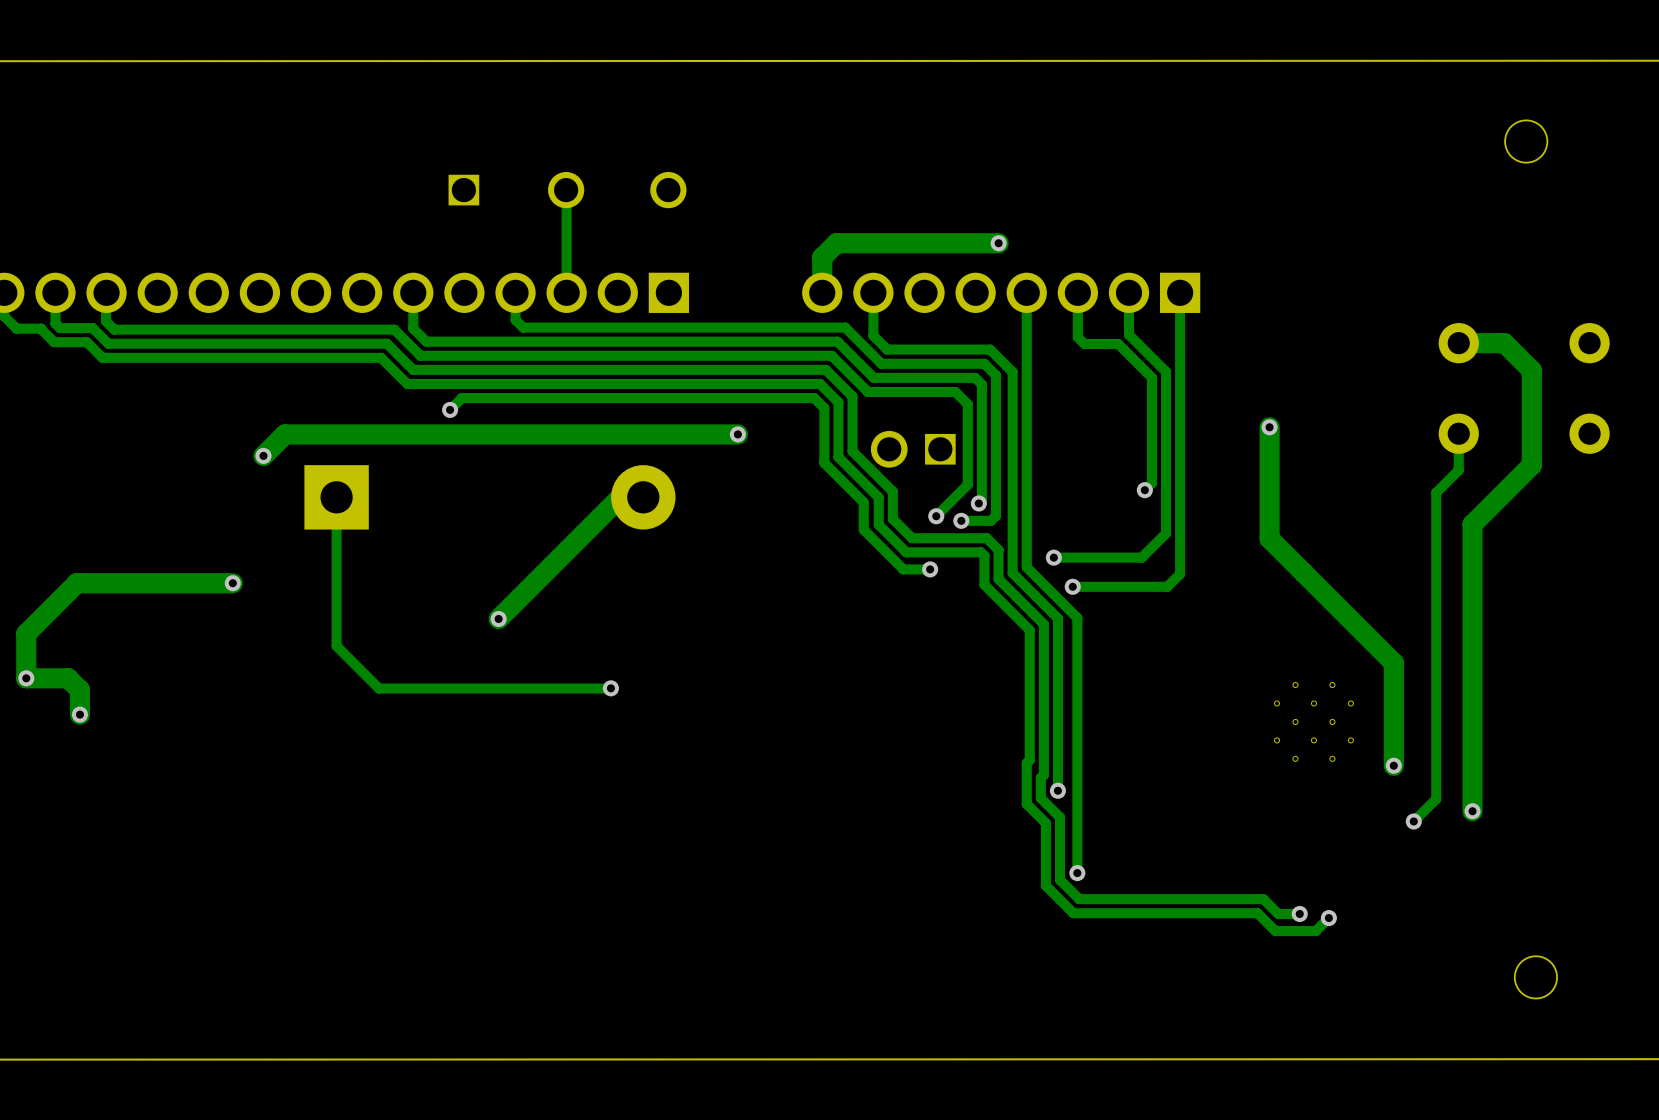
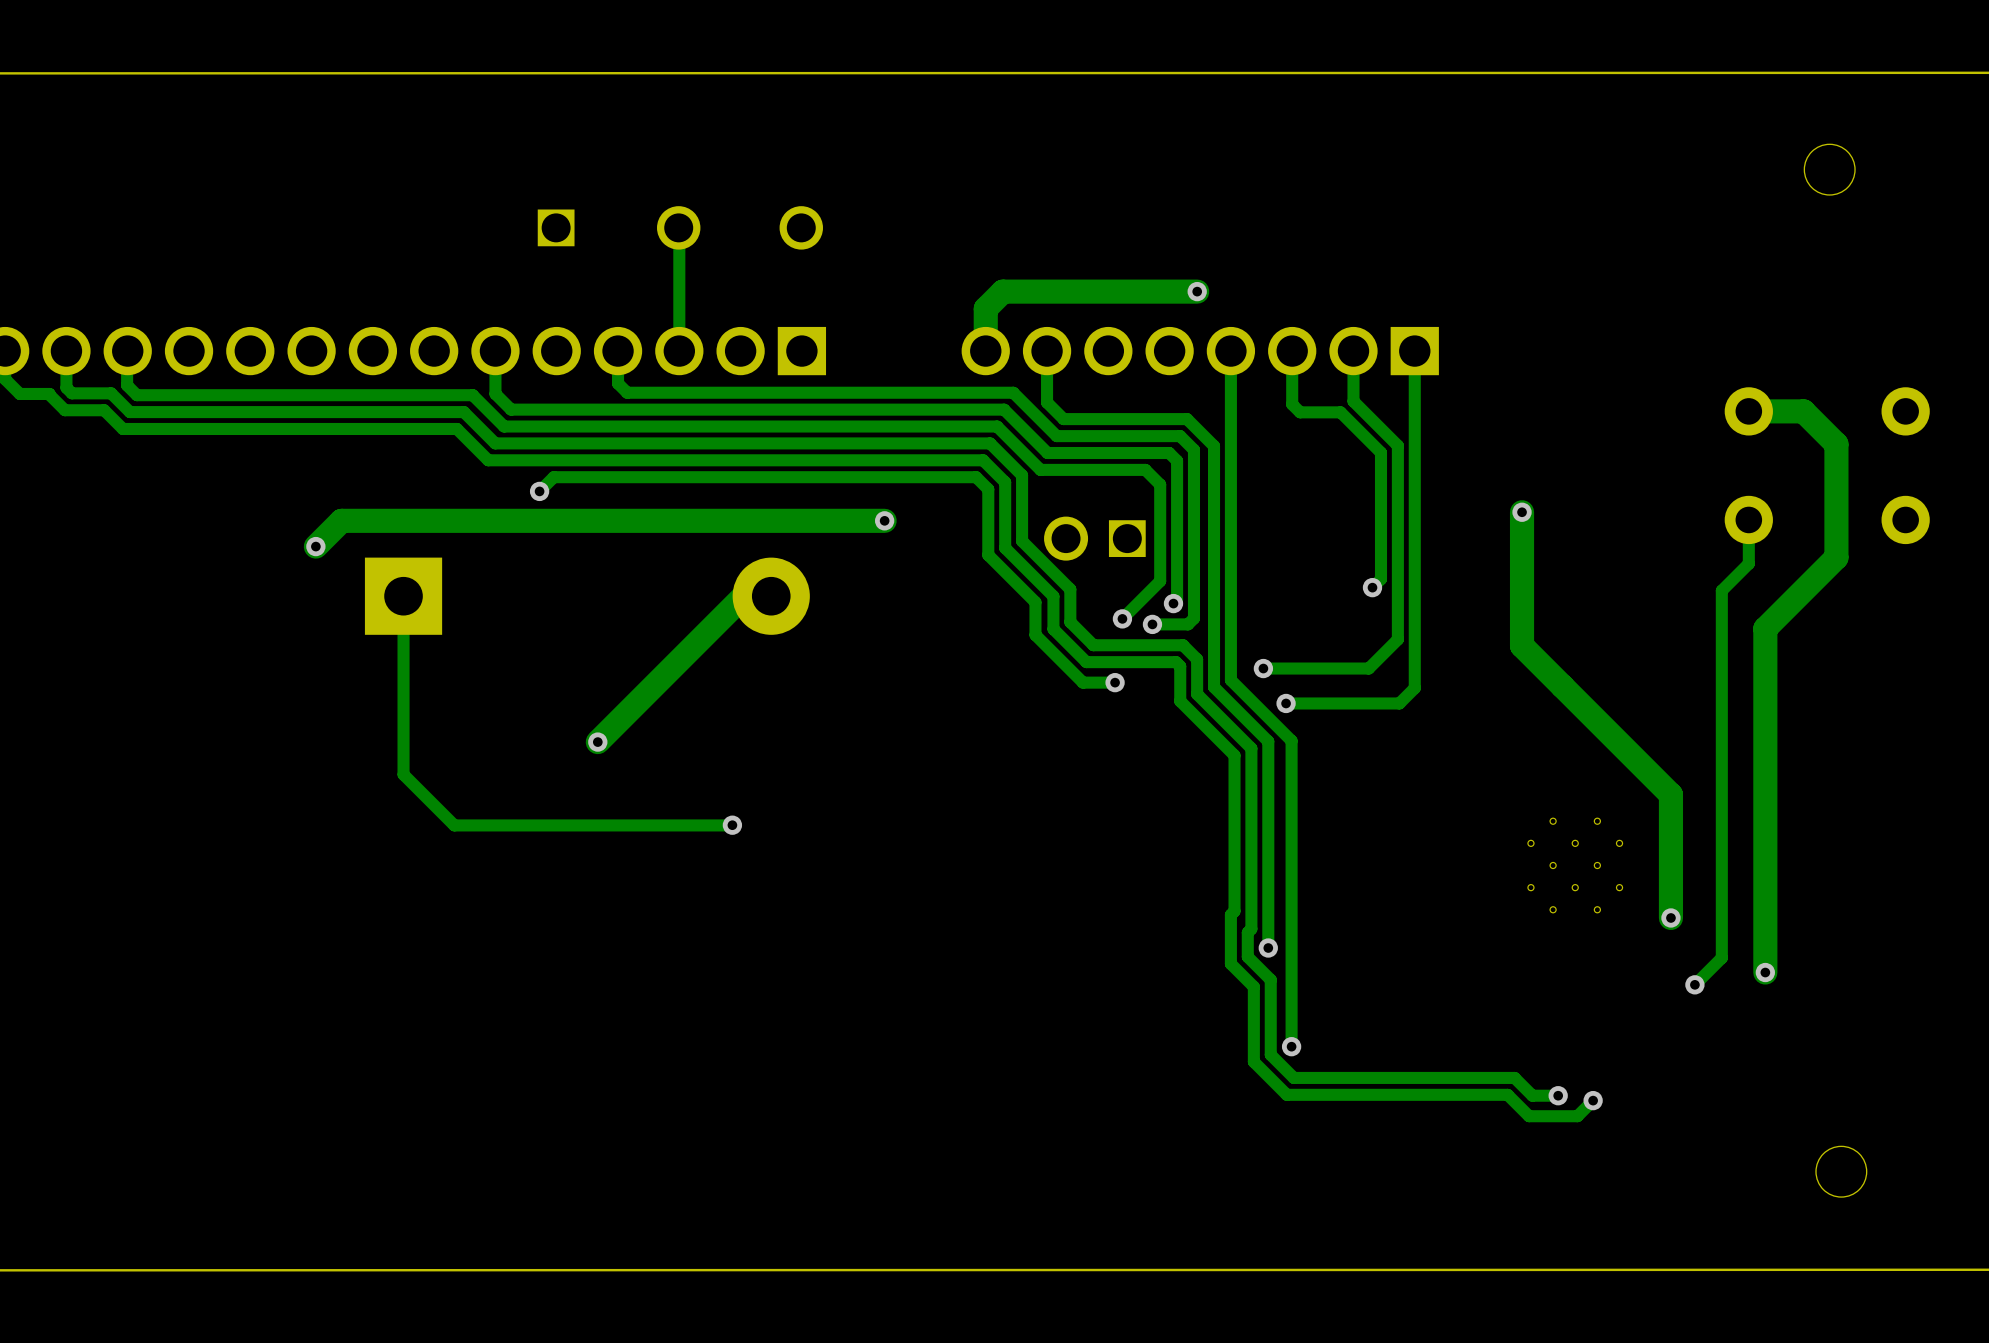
track: (232, 583) (76, 583) (26, 633) (26, 678) (68, 678) (79, 690) (79, 714) -> none
via: (232, 583) -> none
via: (26, 678) -> none
via: (79, 714) -> none

